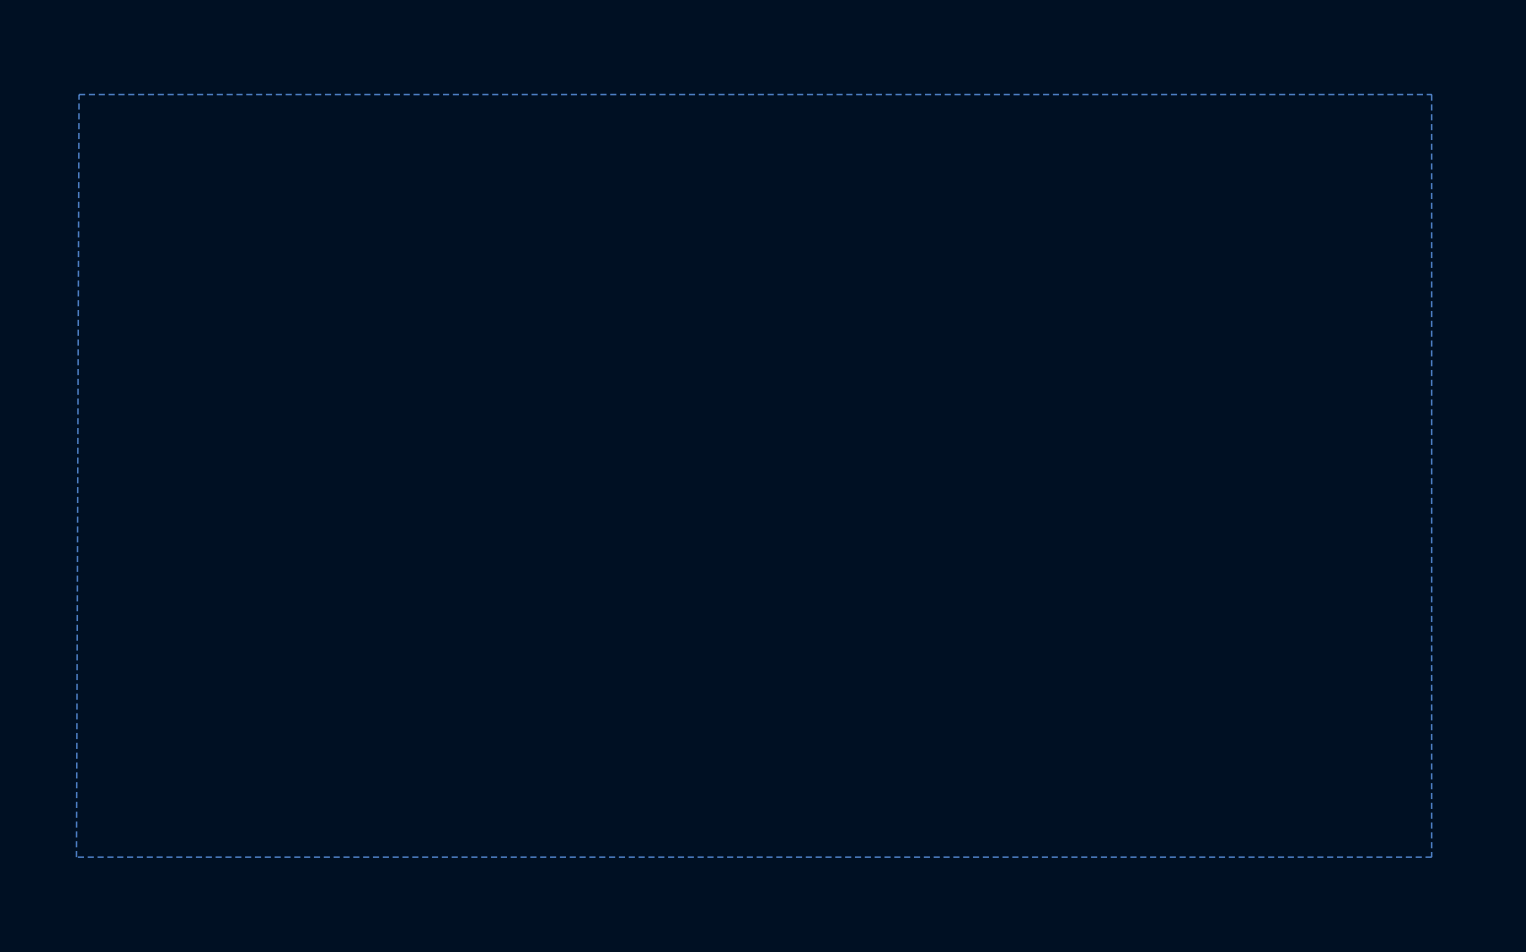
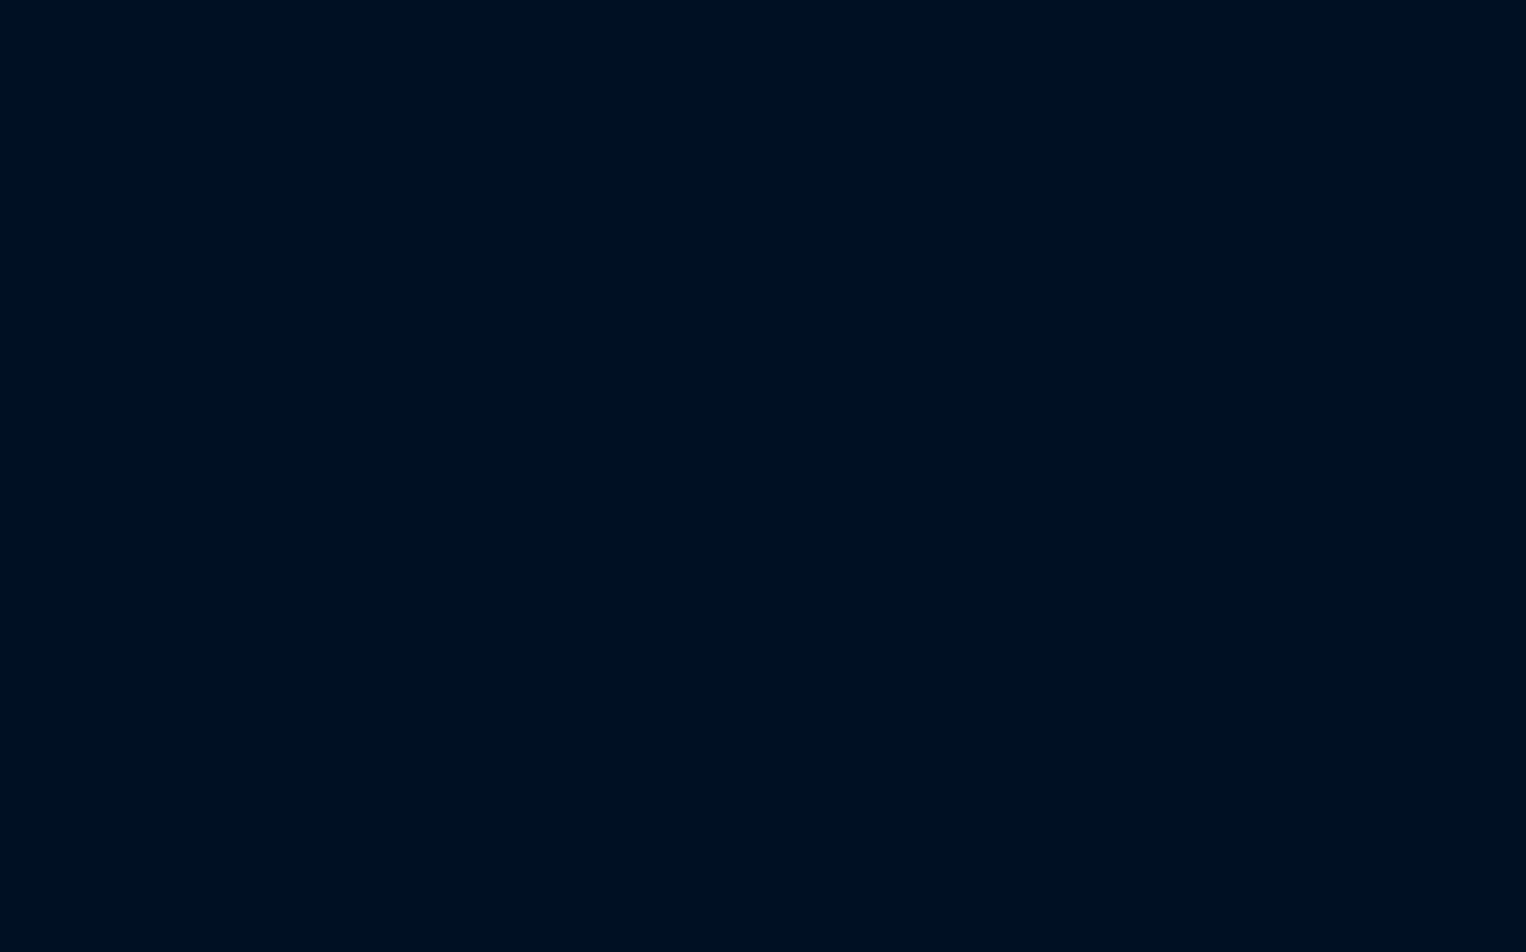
bottom zone outline: (79, 94) (76, 857) (1431, 857) (1431, 94) (79, 94) -> none

